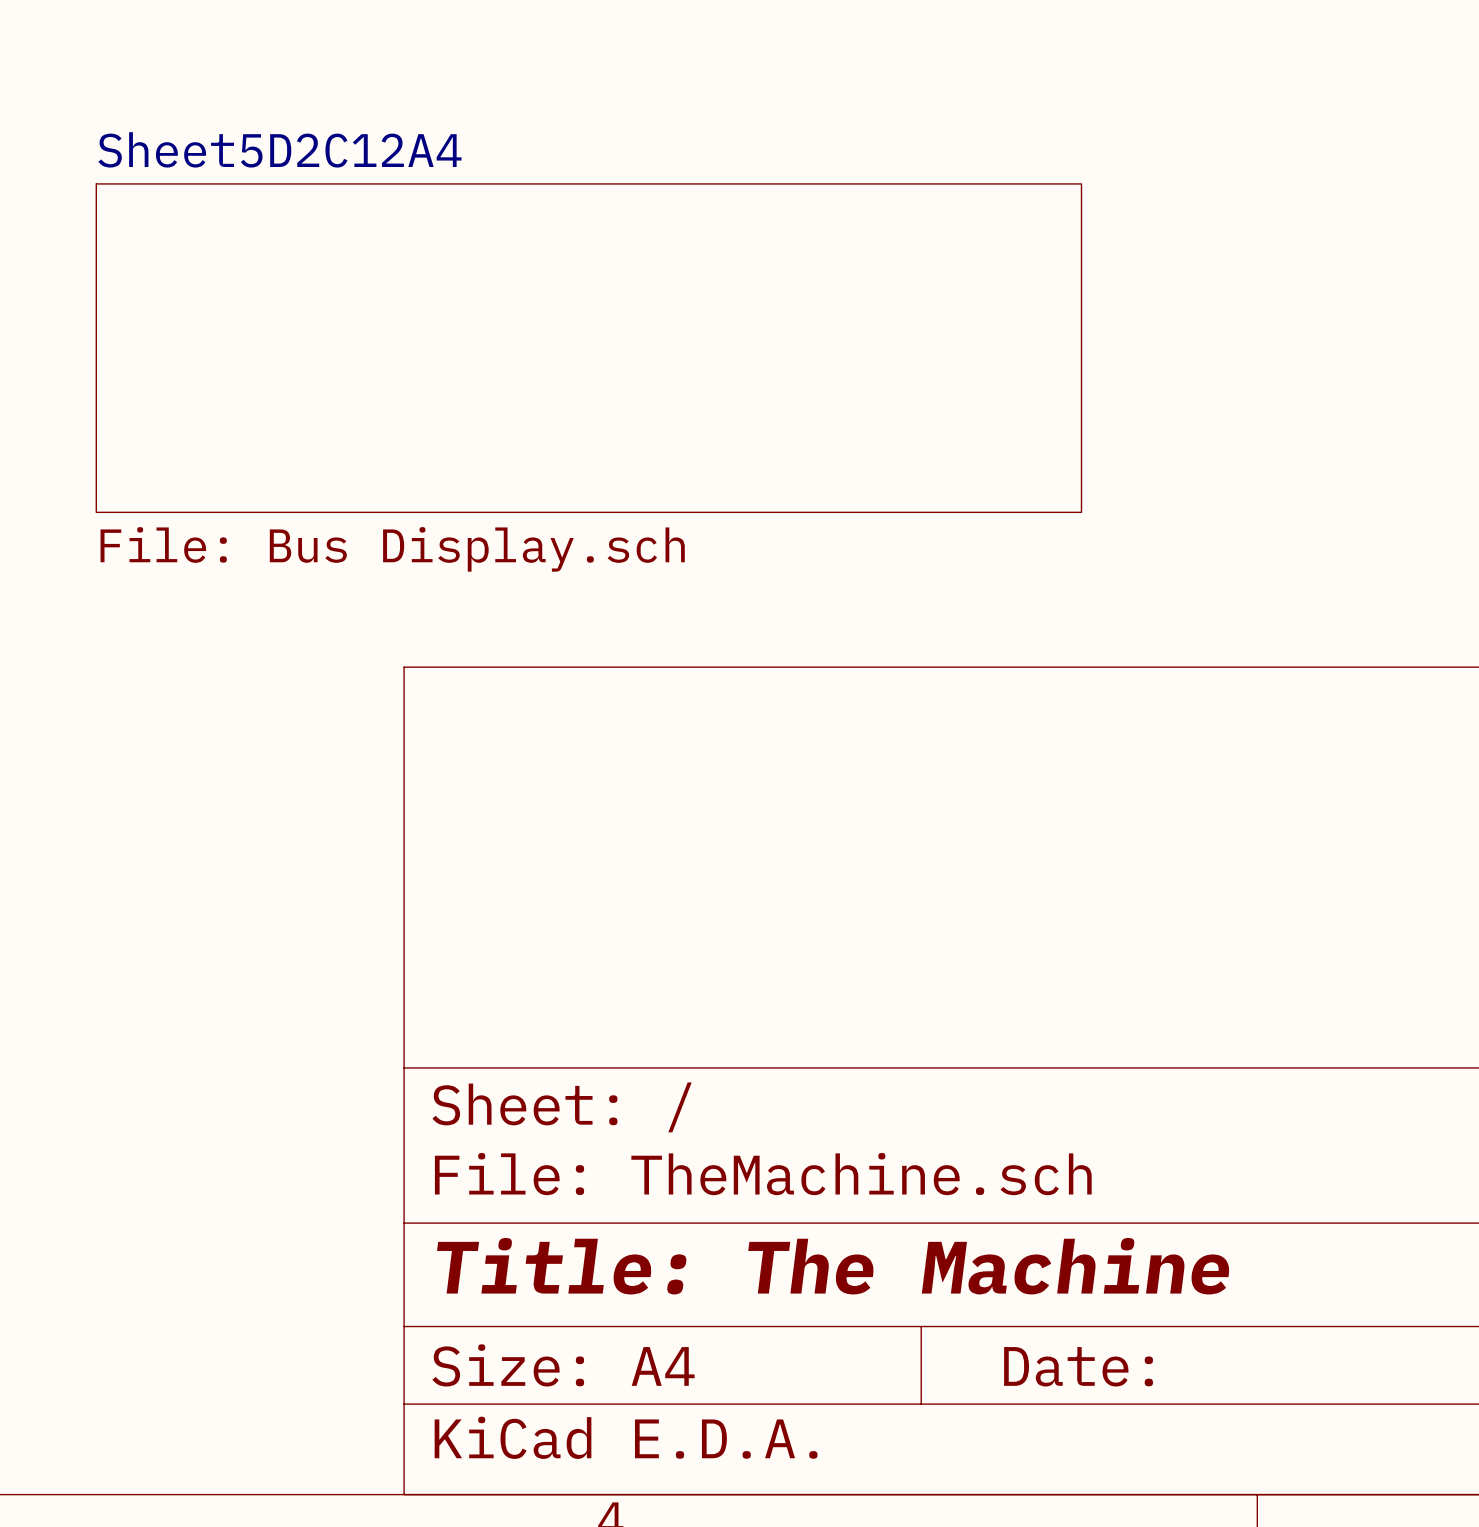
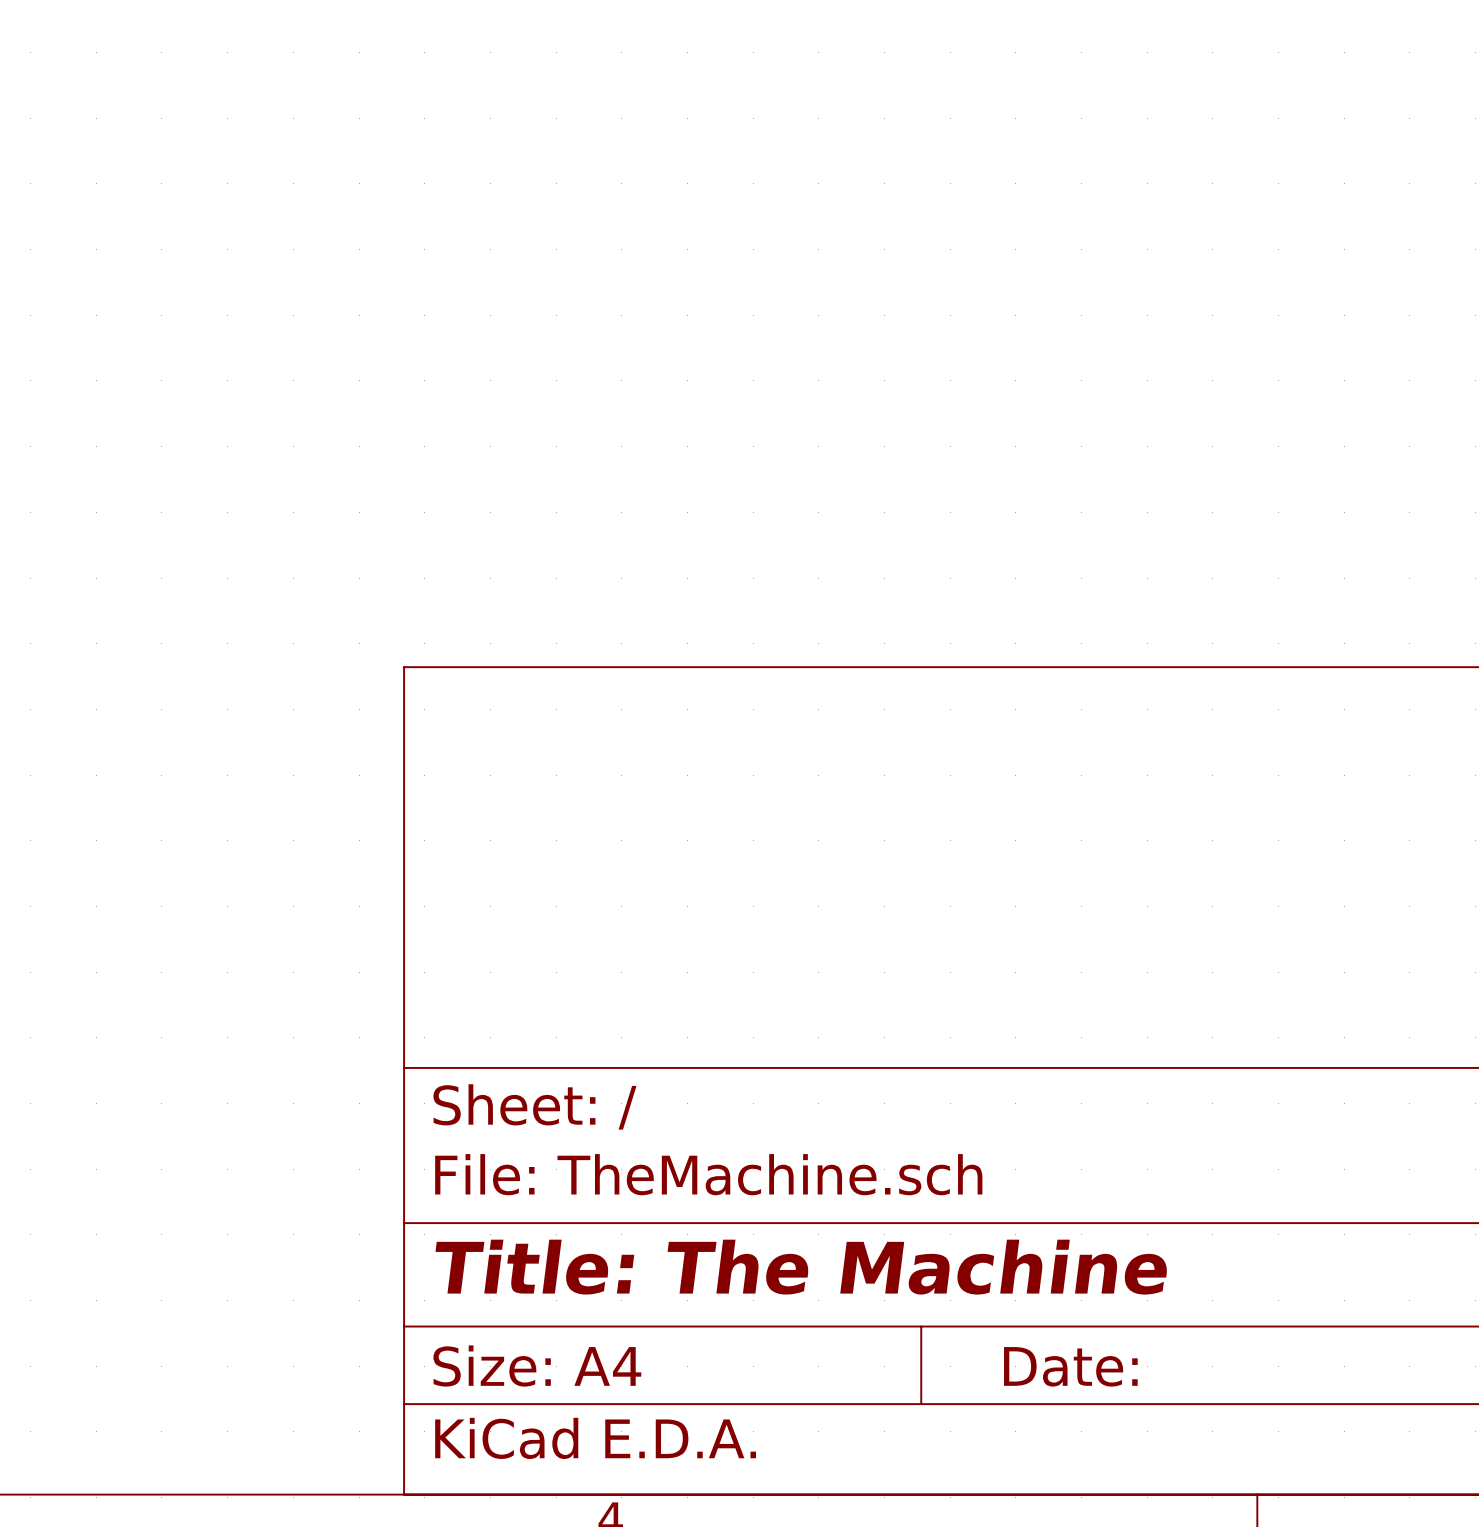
sheet Sheet5D2C12A4: File: Bus Display.sch (588, 348) -> none

